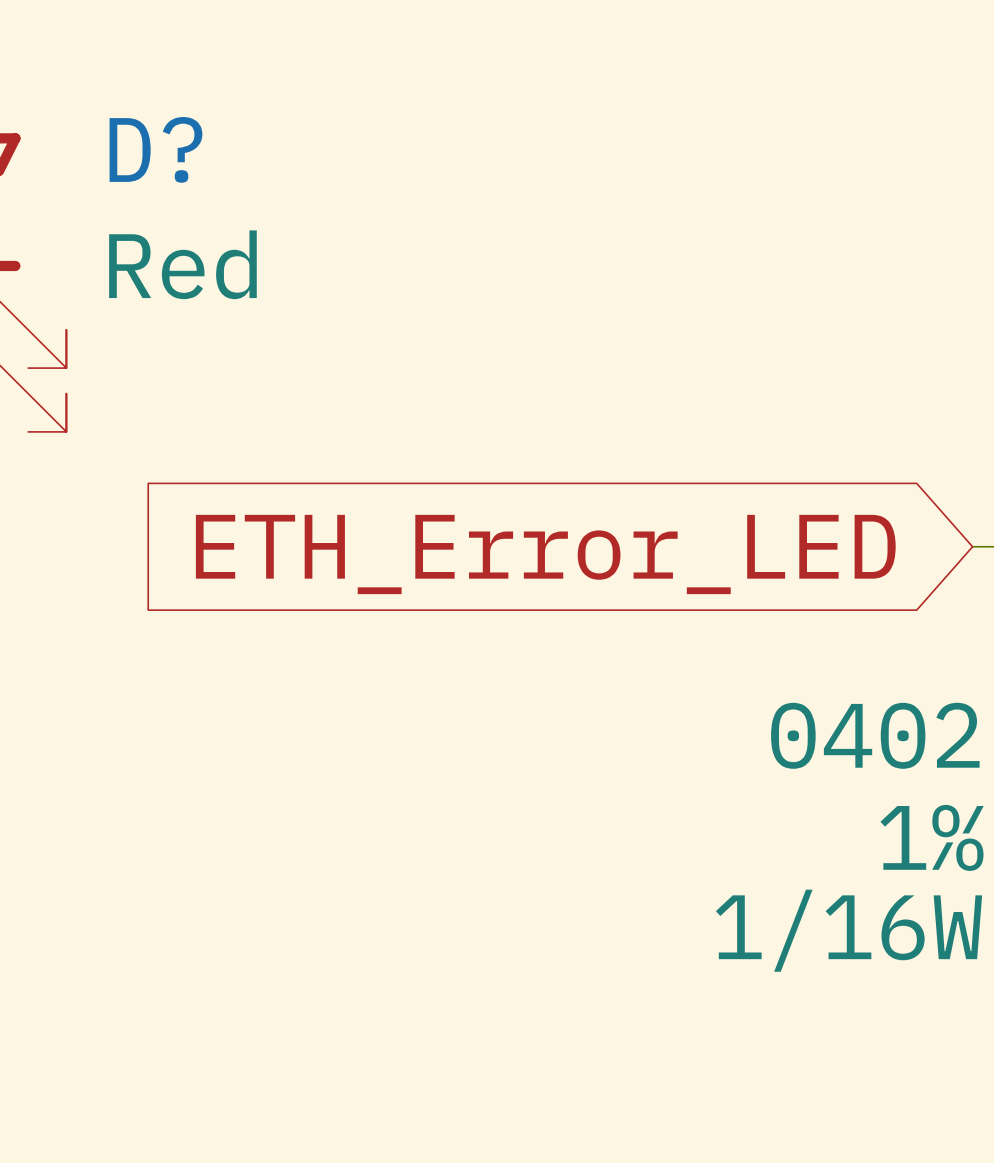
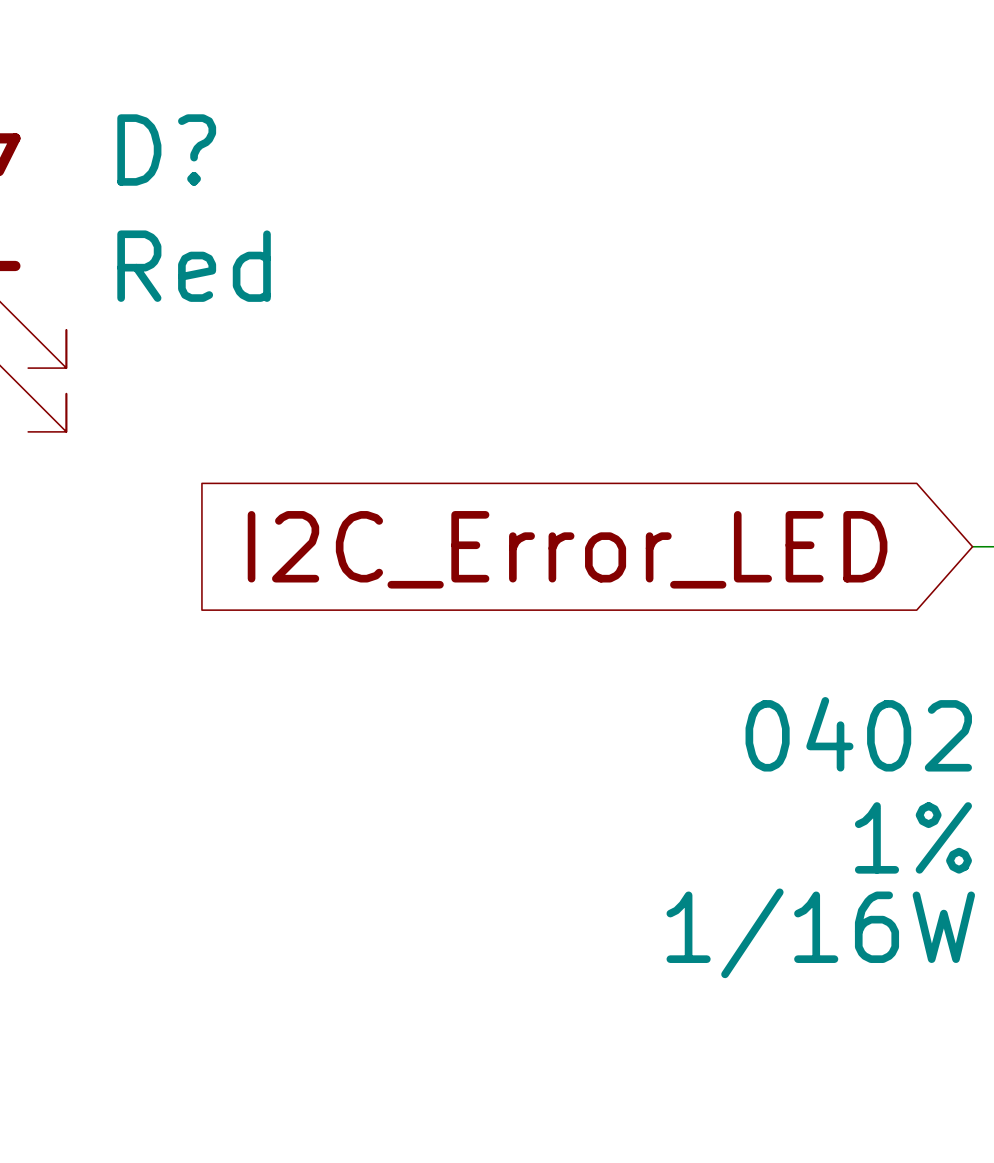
global label: ETH_Error_LED (545, 554) -> I2C_Error_LED (567, 549)

